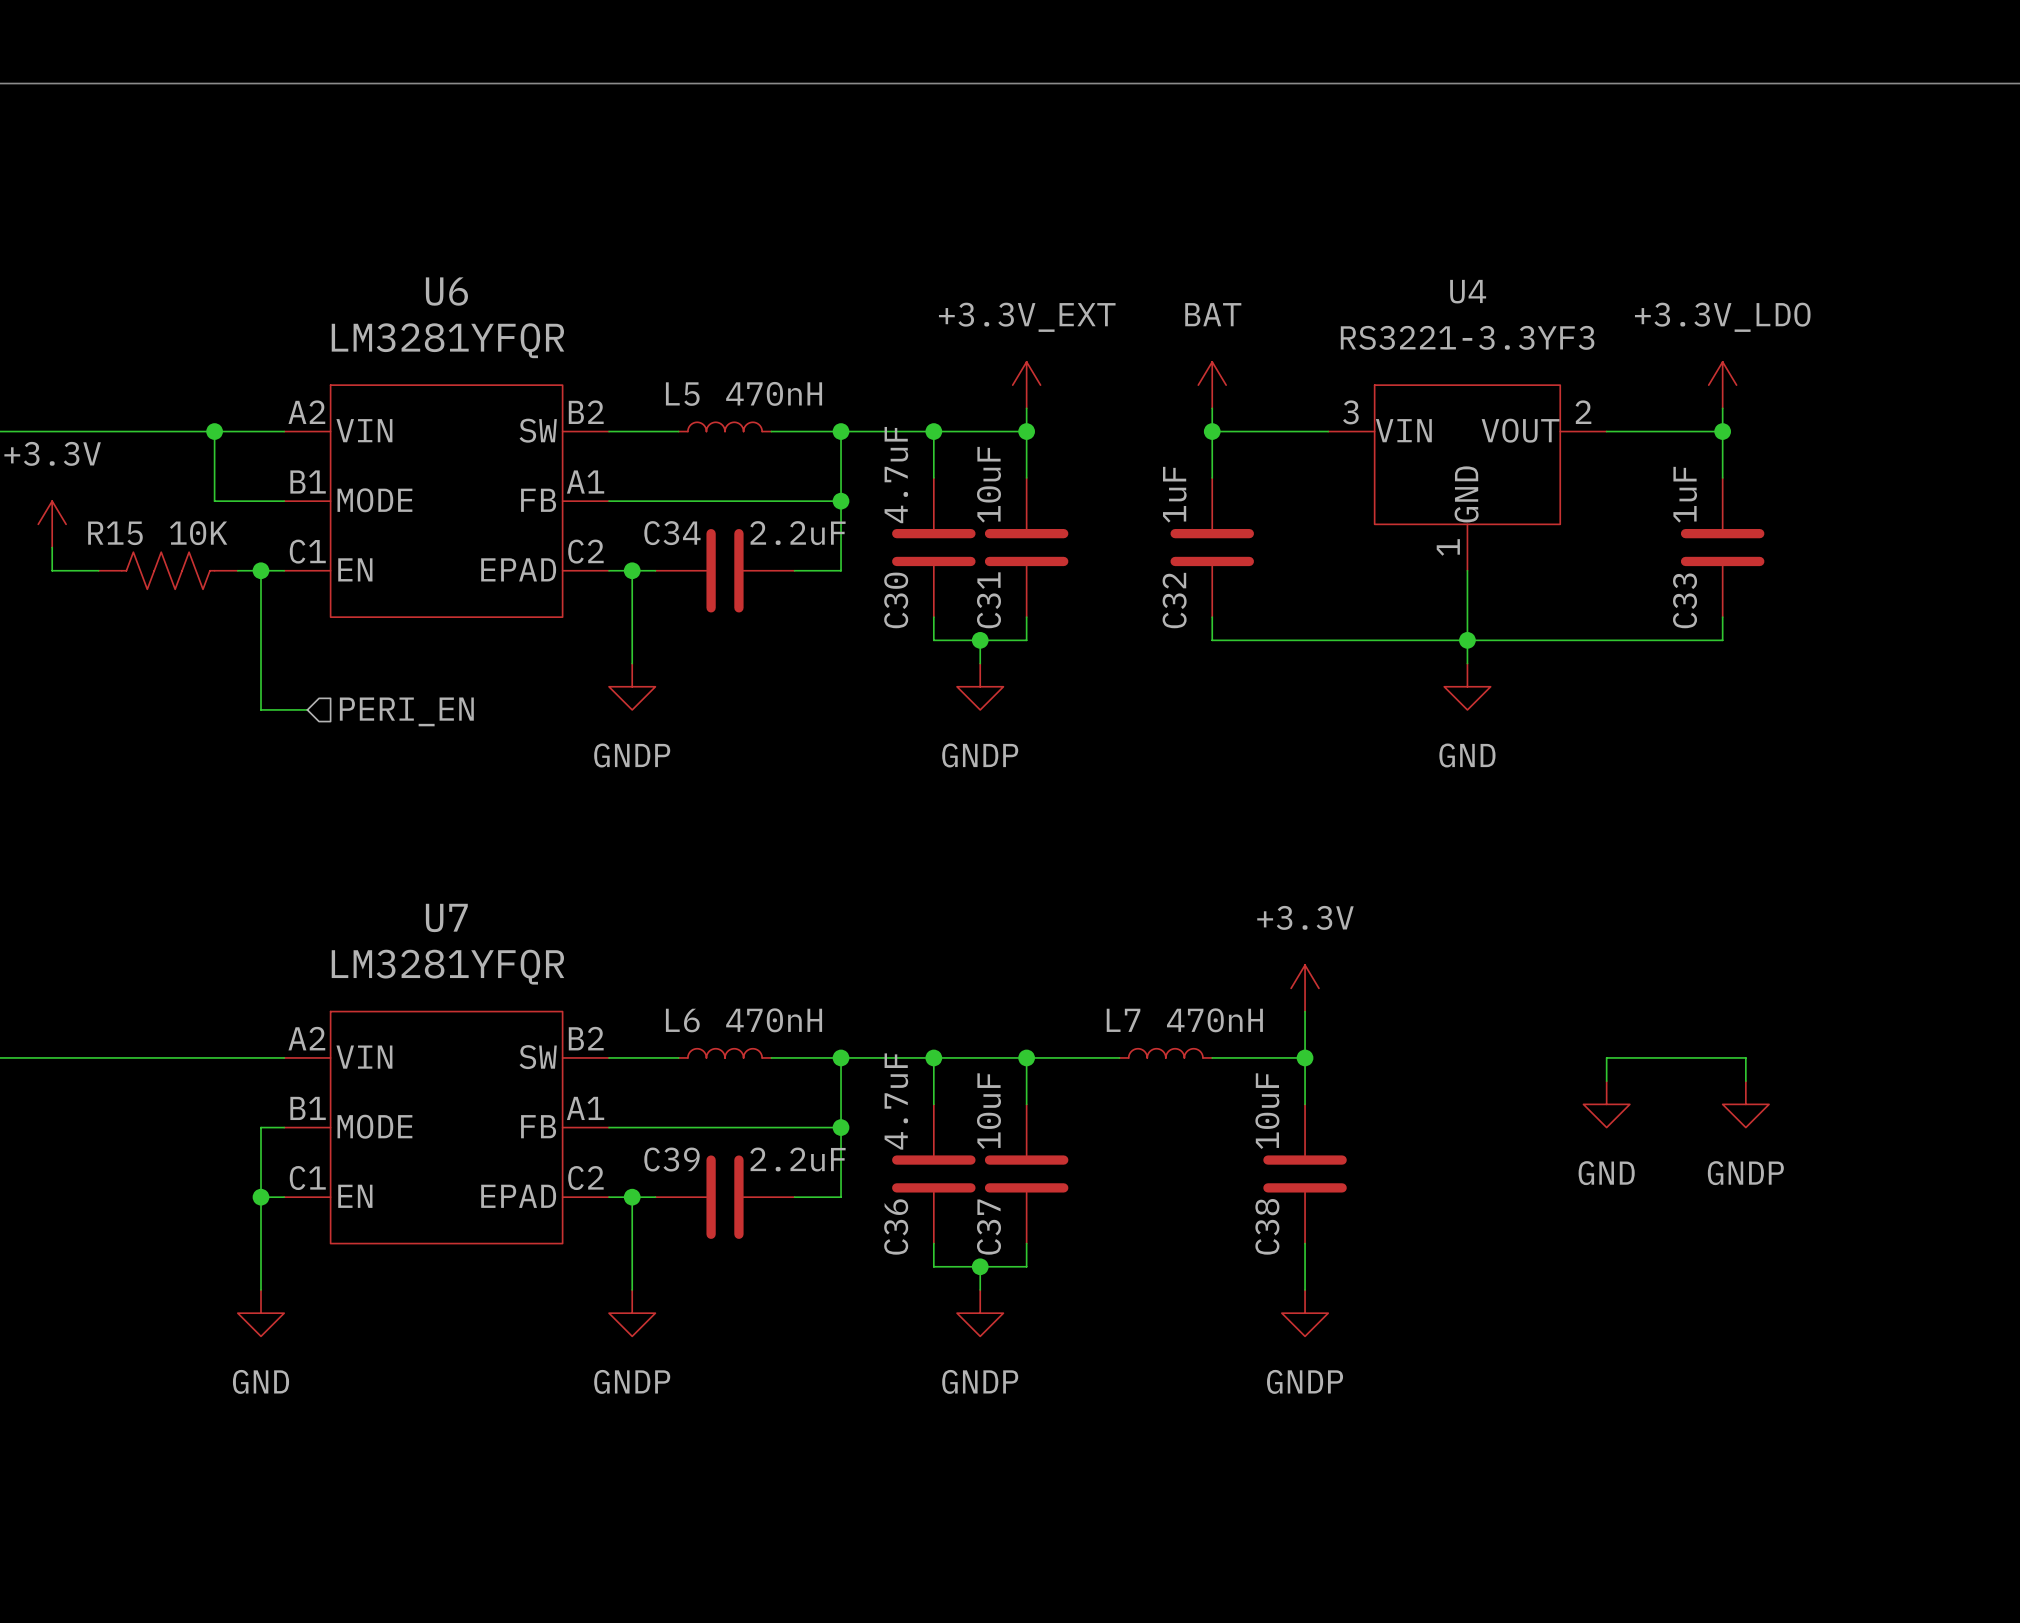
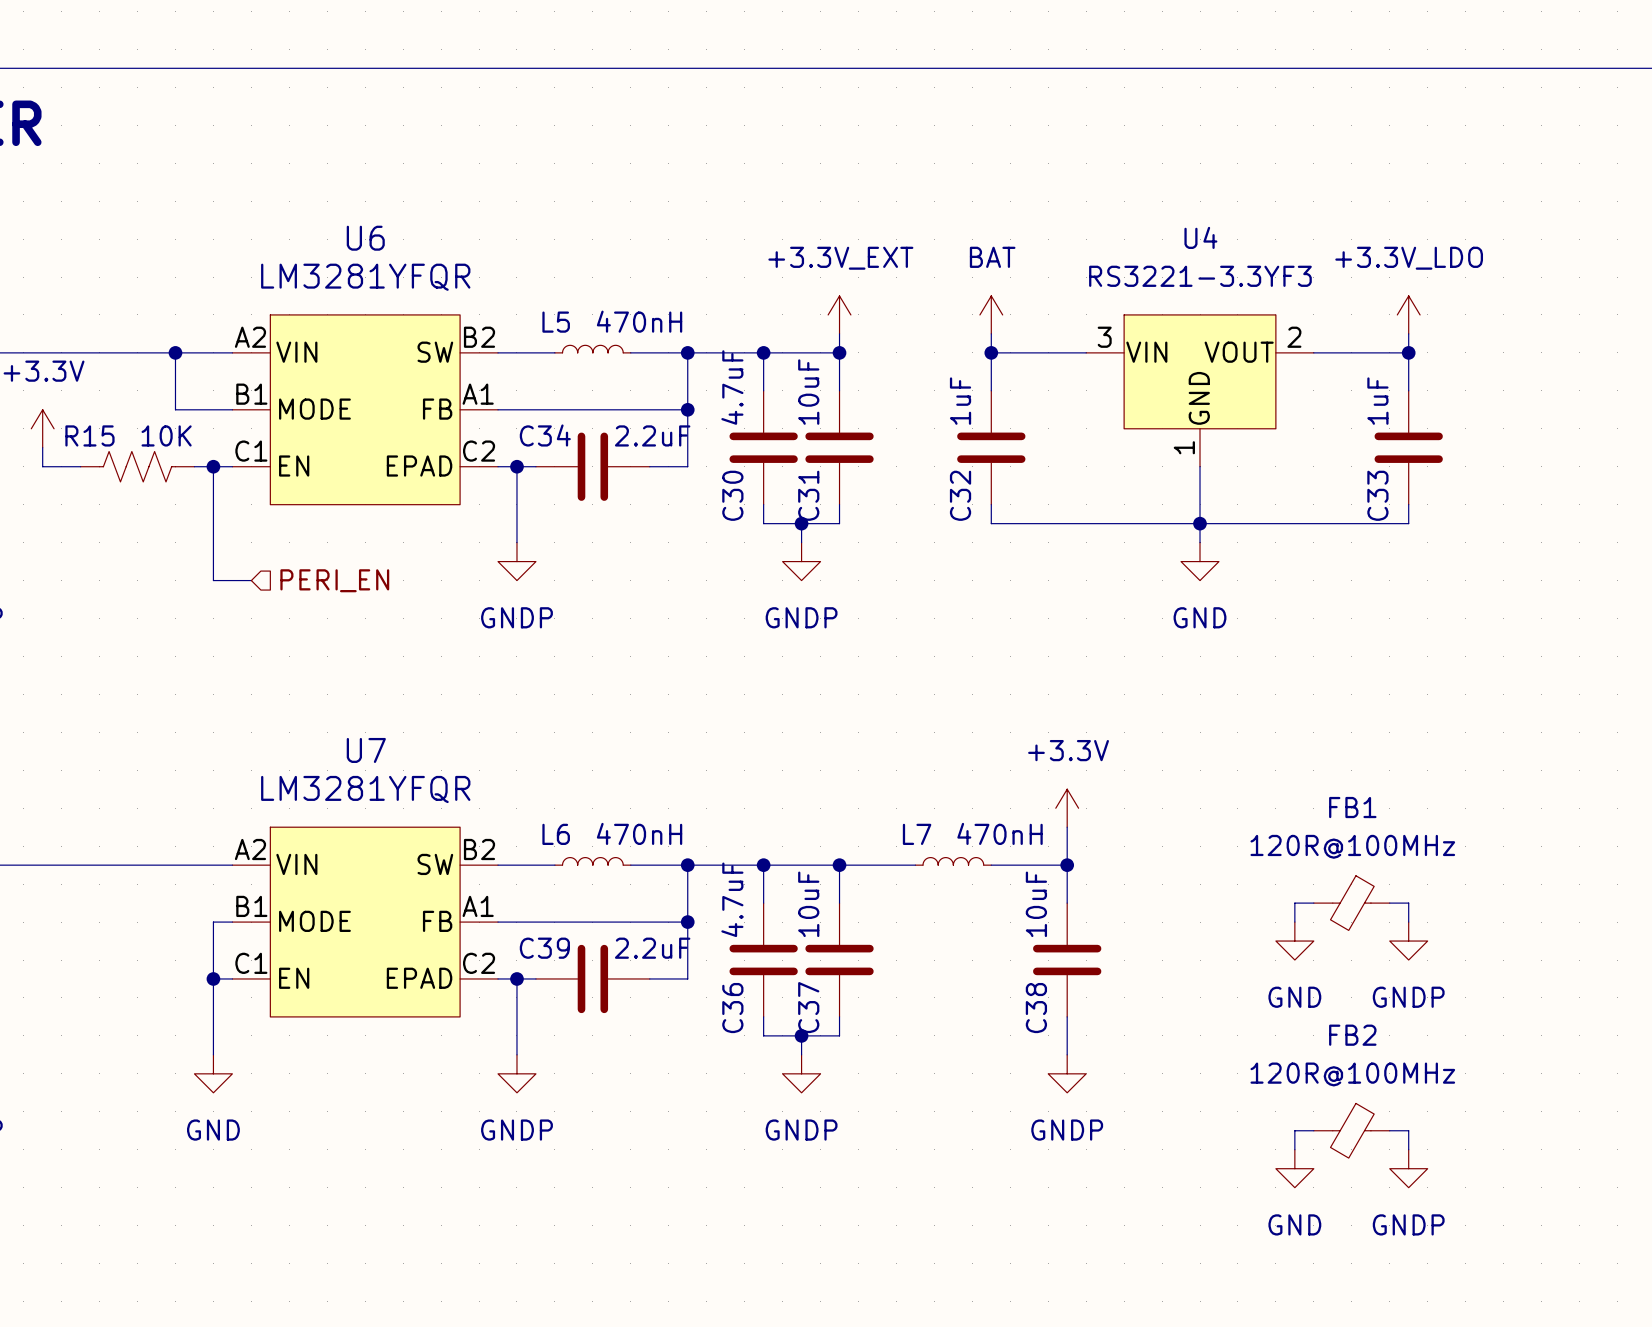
wire: (1606, 1081) (1606, 1057) (1745, 1057) (1745, 1081) -> none
wire: none -> (1313, 903) (1294, 903) (1294, 922)
power symbol position: GND (1606, 1104) -> GND (1294, 941)
FB1: none -> 120R@100MHz (1351, 903)
wire: none -> (1389, 903) (1408, 903) (1408, 922)
power symbol position: GNDP (1745, 1104) -> GNDP (1408, 941)
wire: none -> (1313, 1130) (1294, 1130) (1294, 1149)
FB2: none -> 120R@100MHz (1351, 1130)
wire: none -> (1389, 1130) (1408, 1130) (1408, 1149)
power symbol: none -> GND (1294, 1168)
power symbol: none -> GNDP (1408, 1168)

